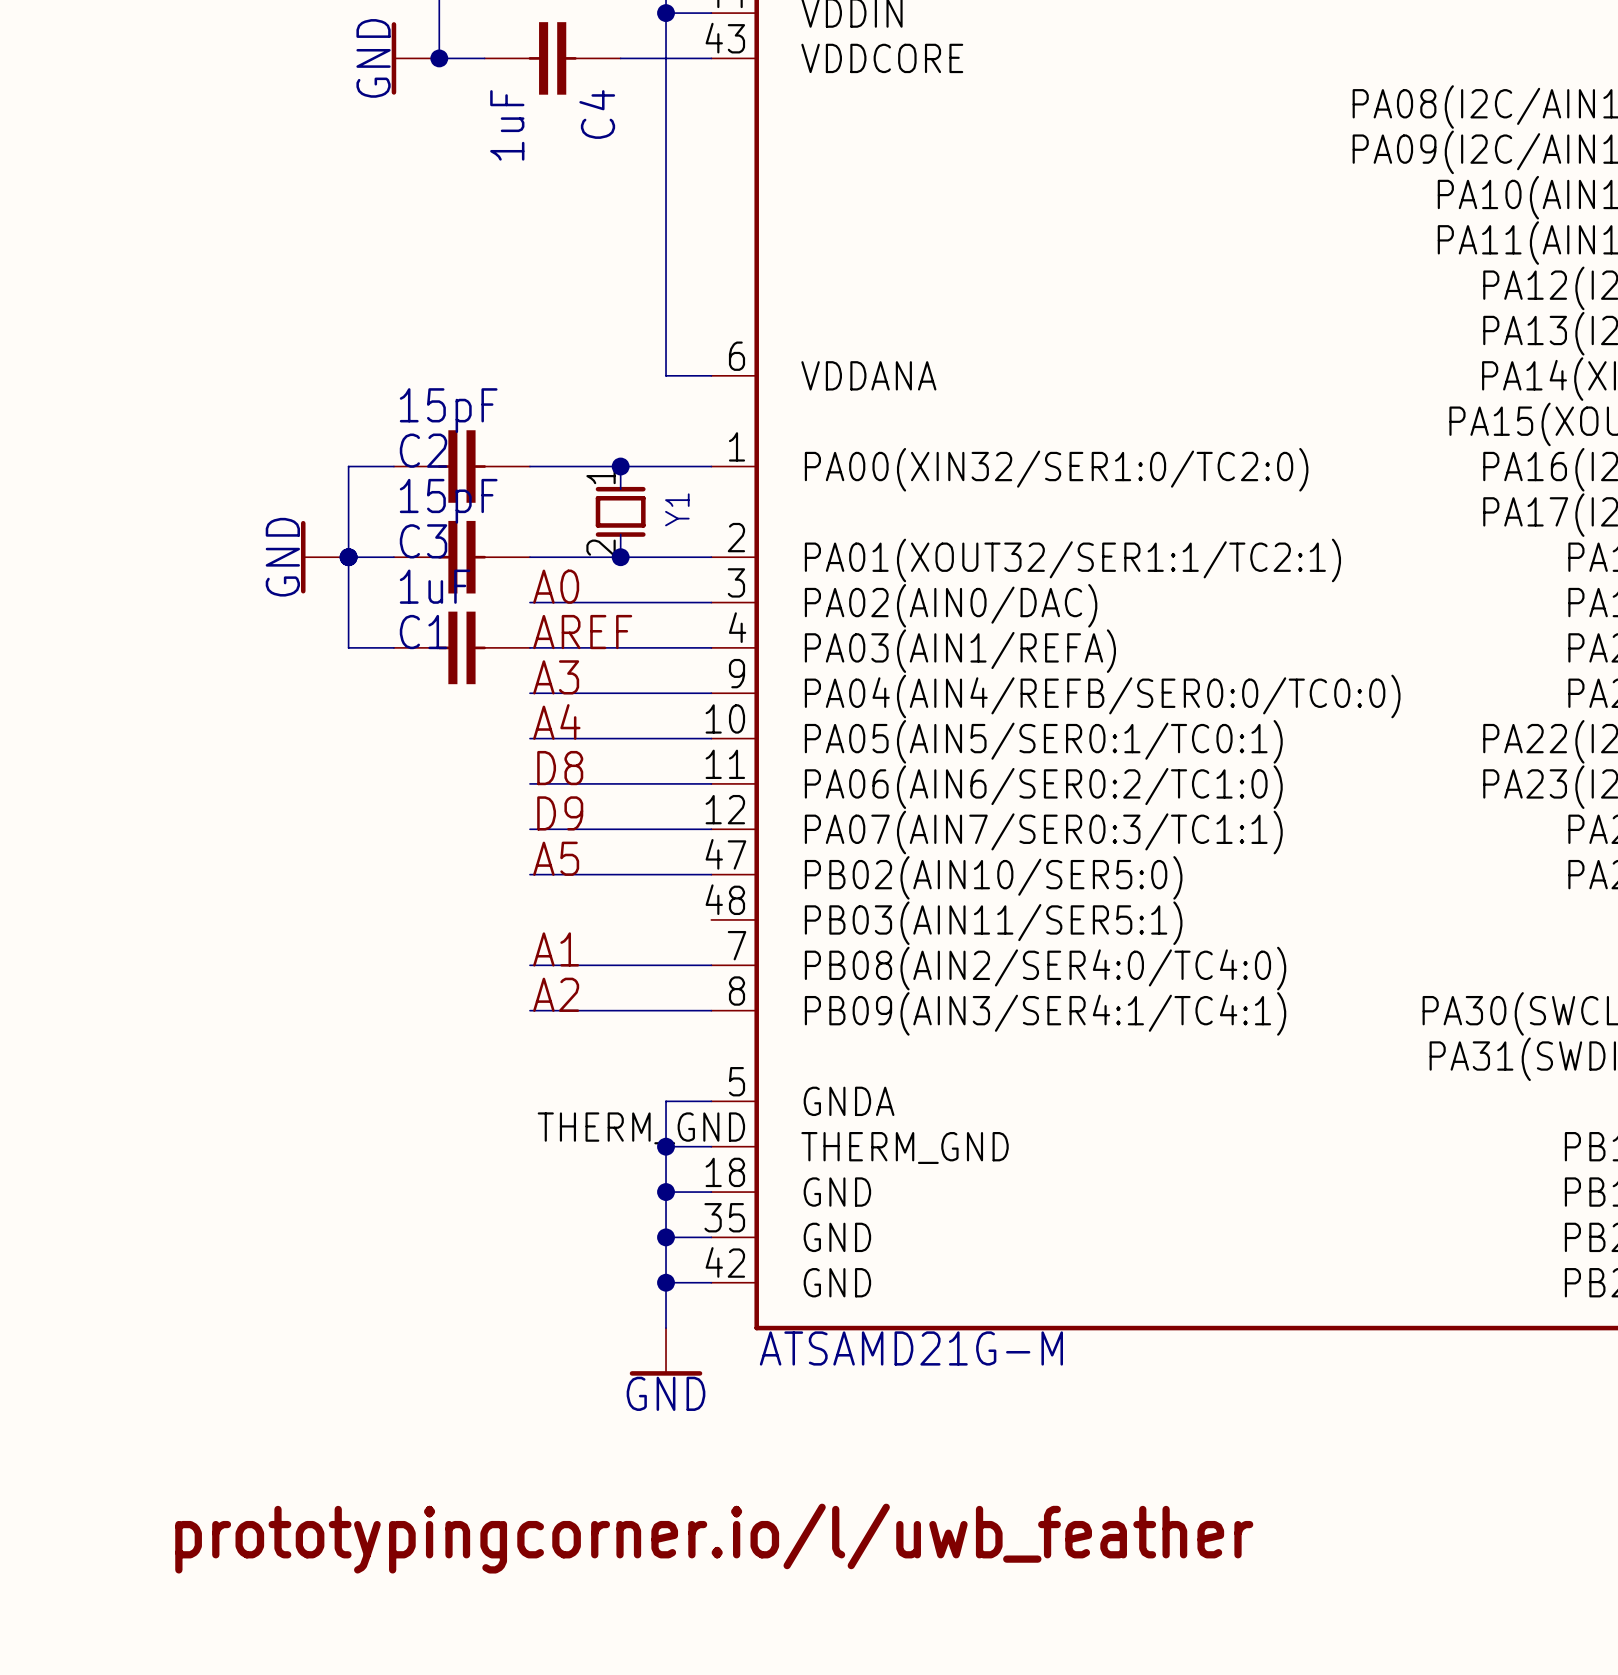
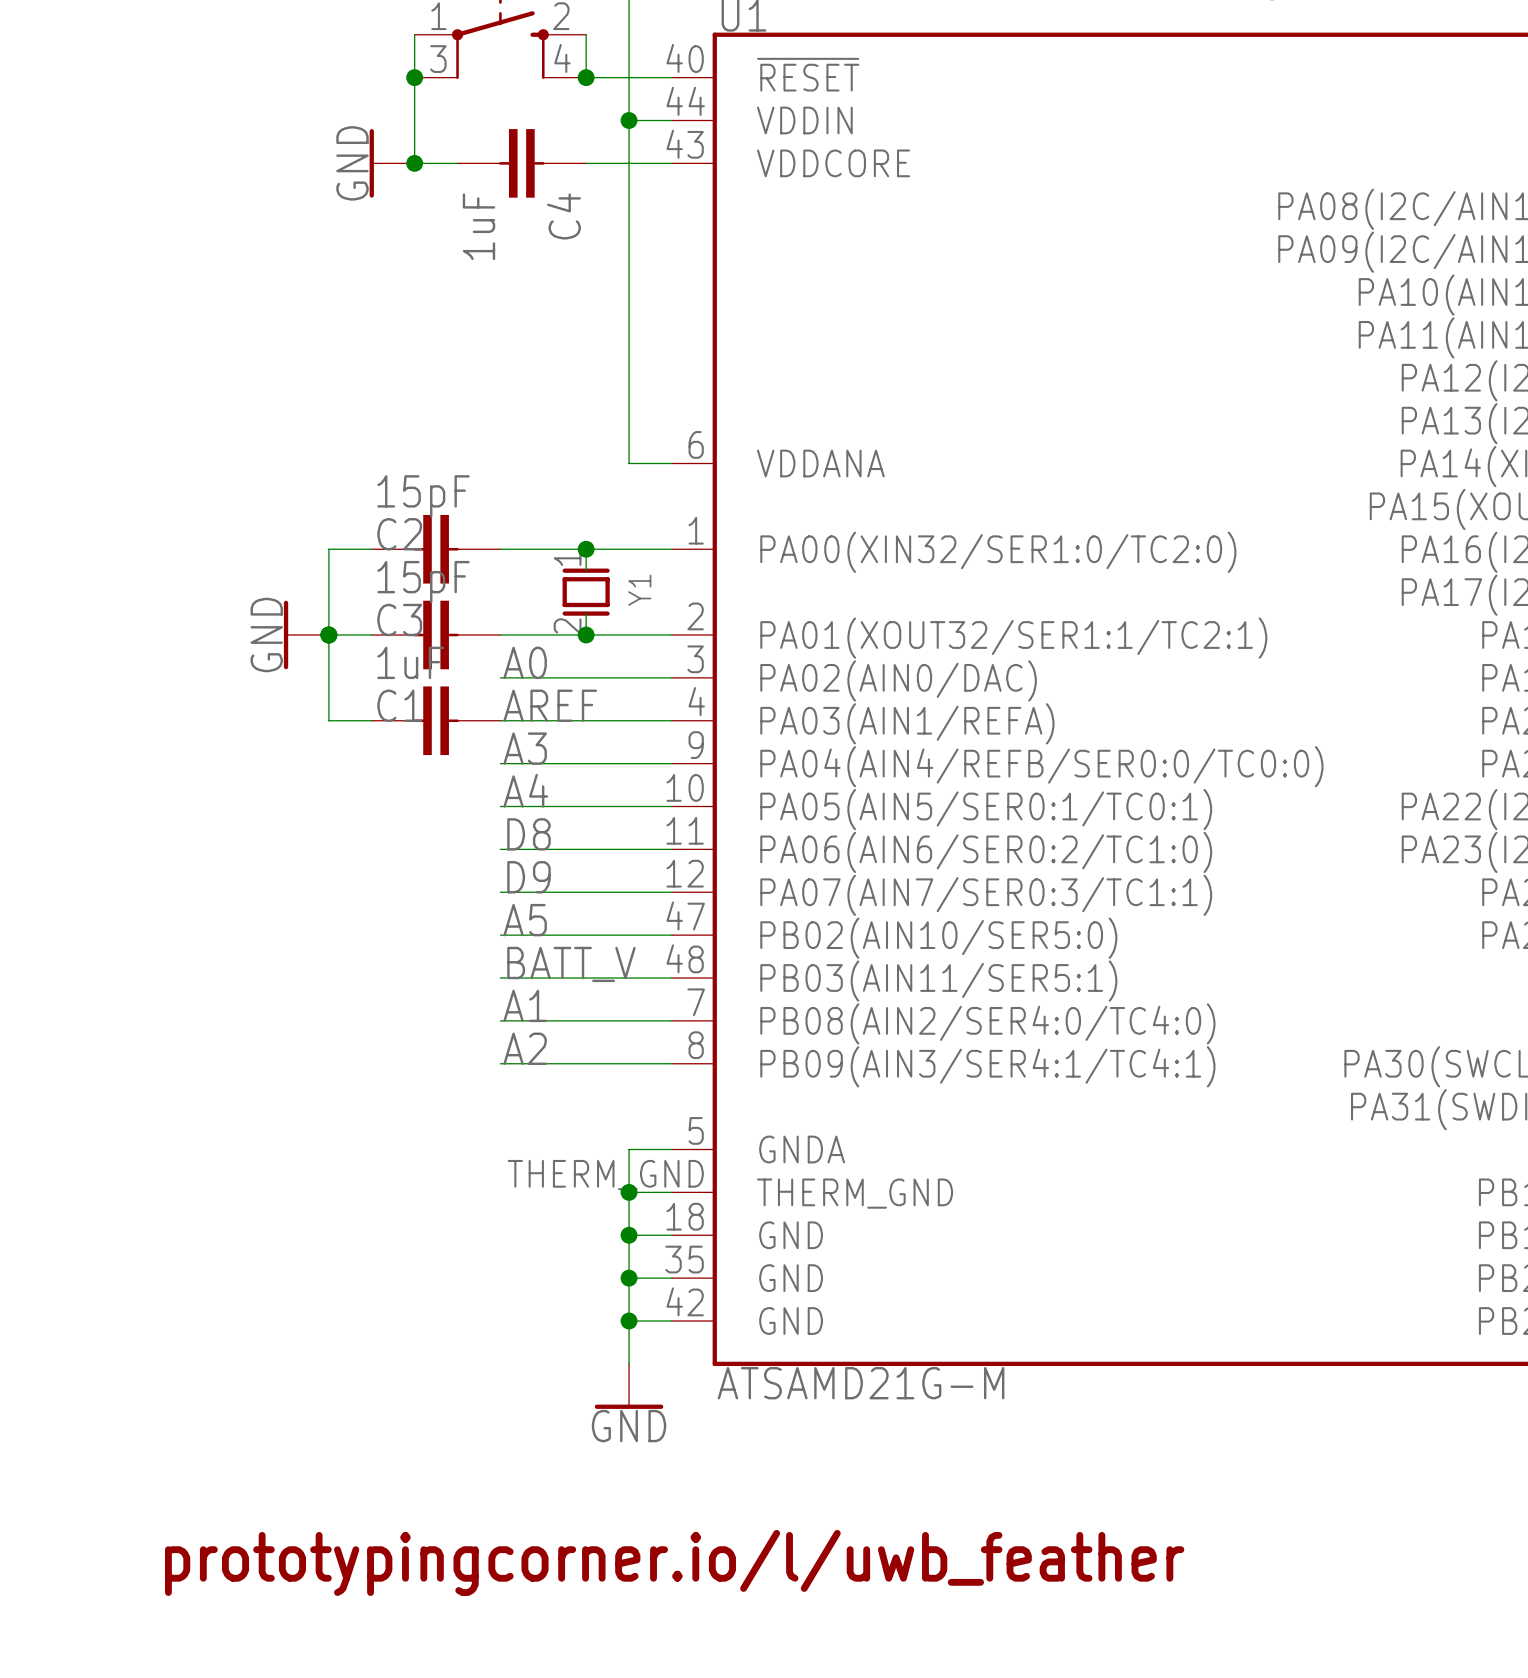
label: none -> BATT_V (571, 964)
wire: none -> (500, 978) (671, 978)

